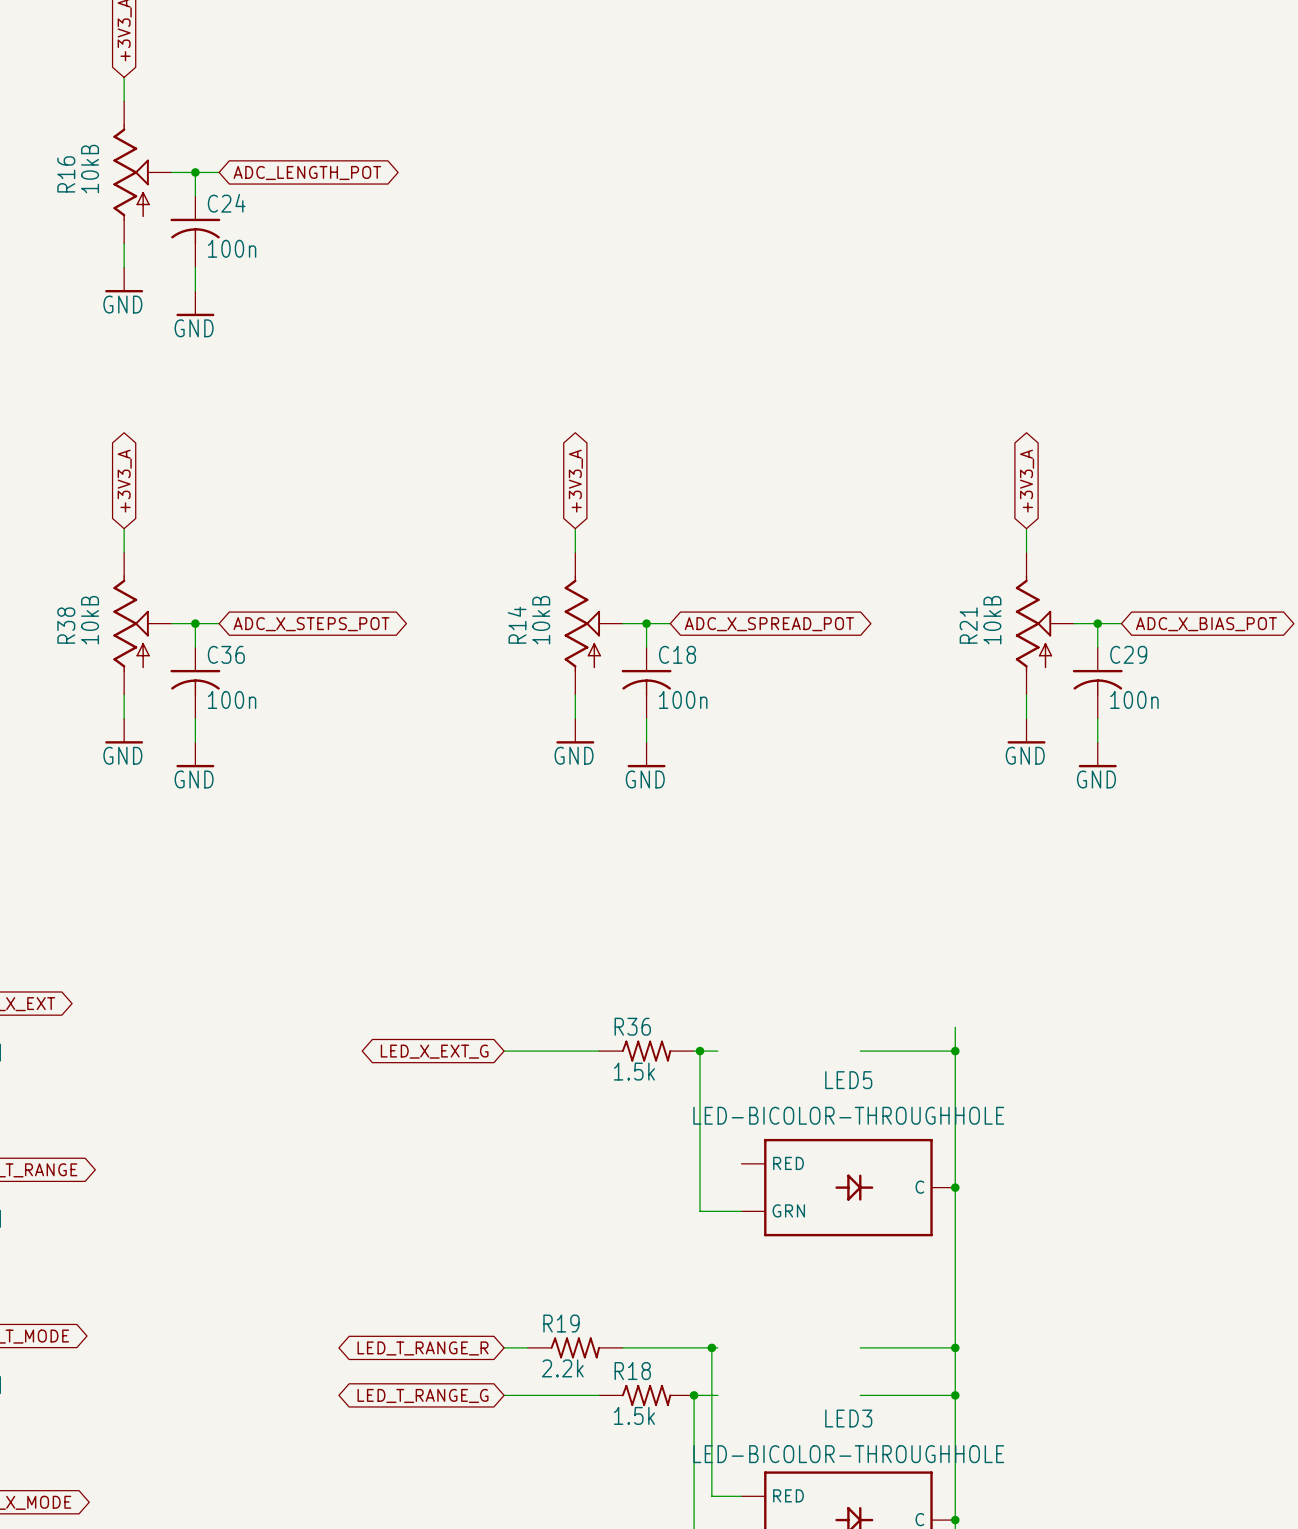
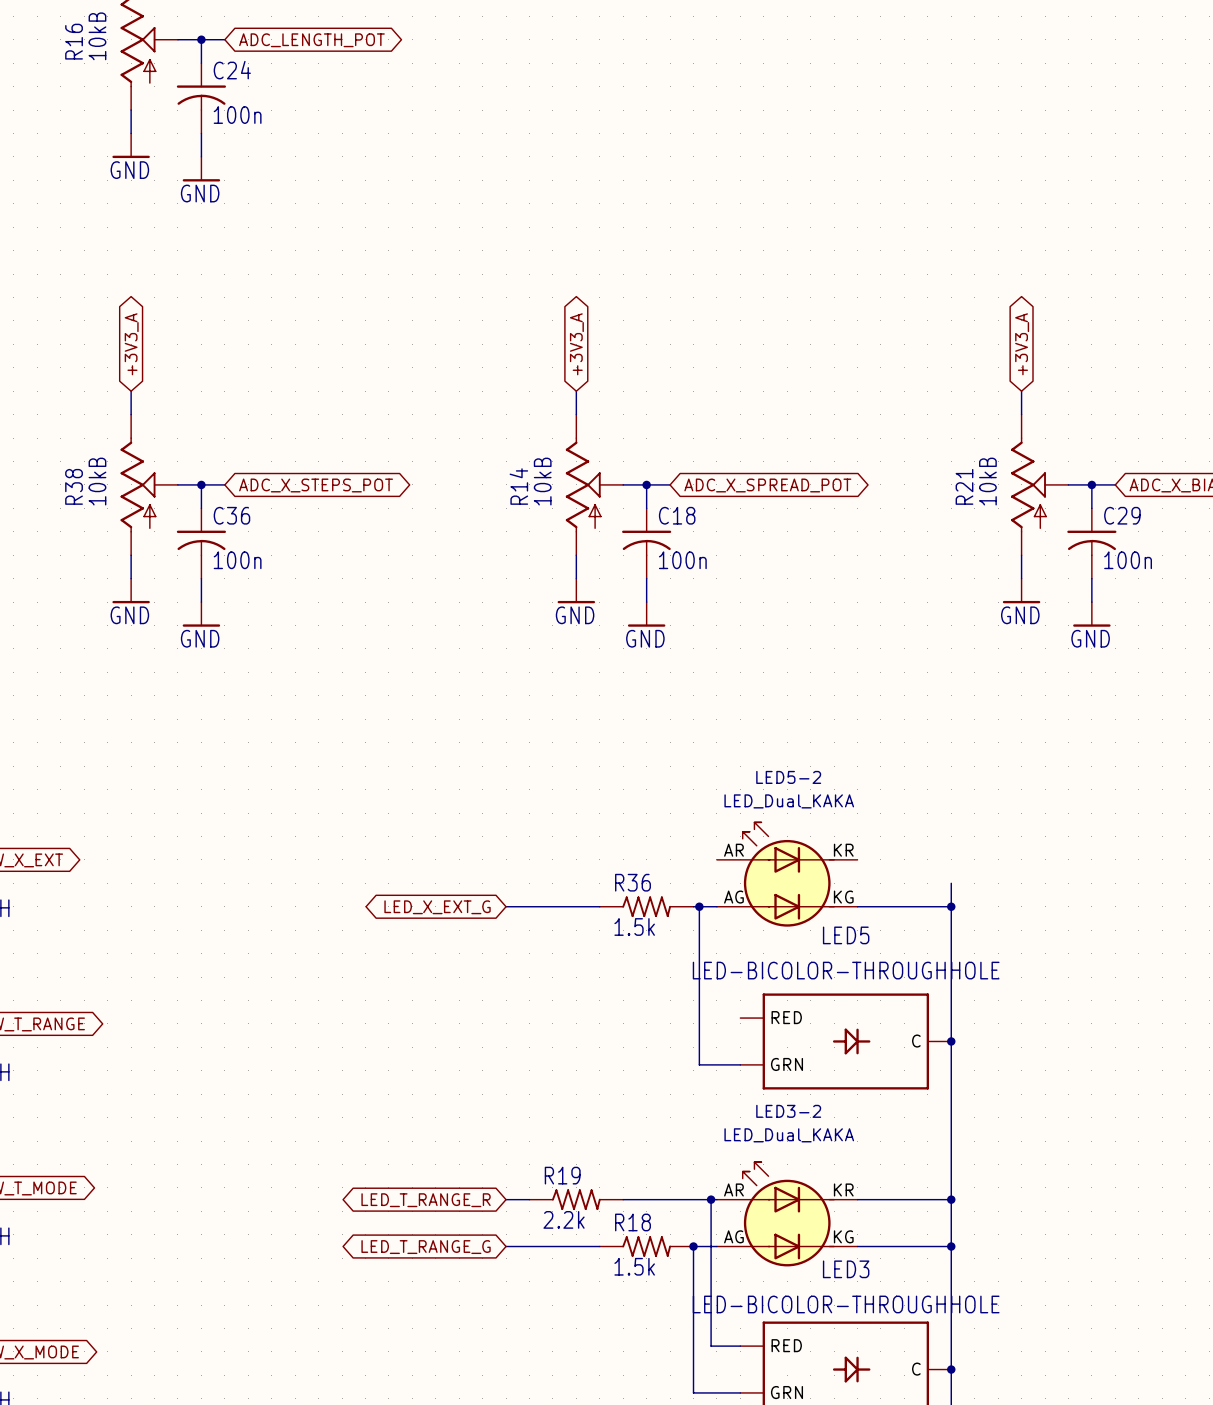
LED5-2: none -> LED_Dual_KAKA (787, 874)
LED3-2: none -> LED_Dual_KAKA (787, 1214)

